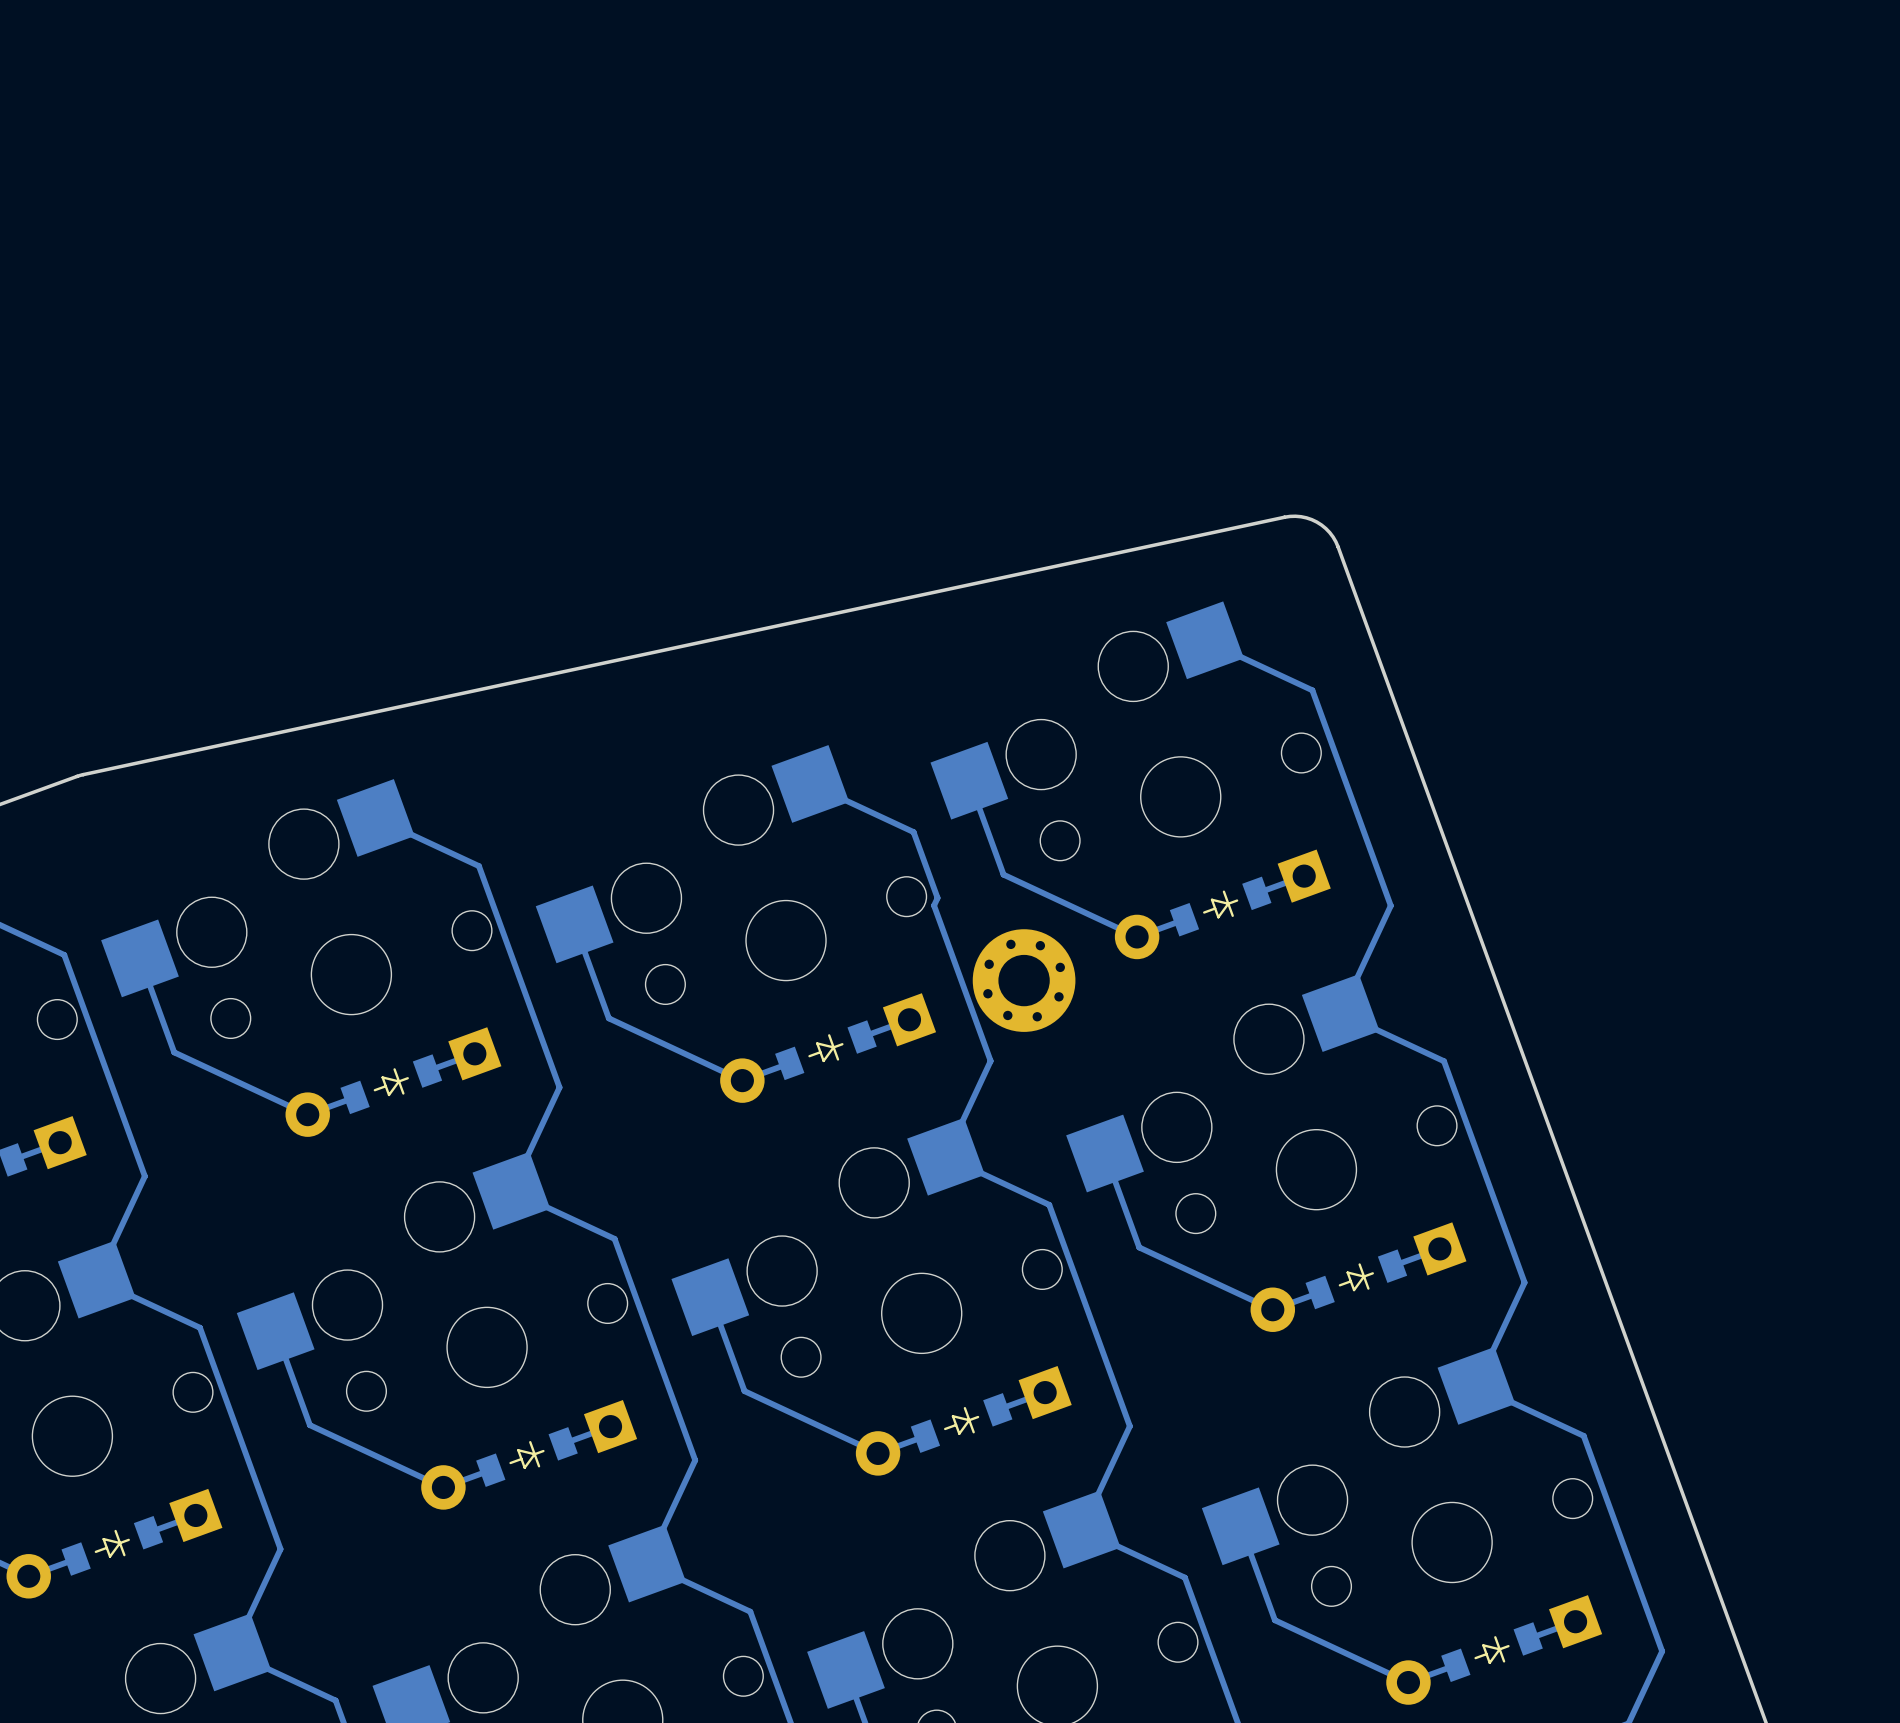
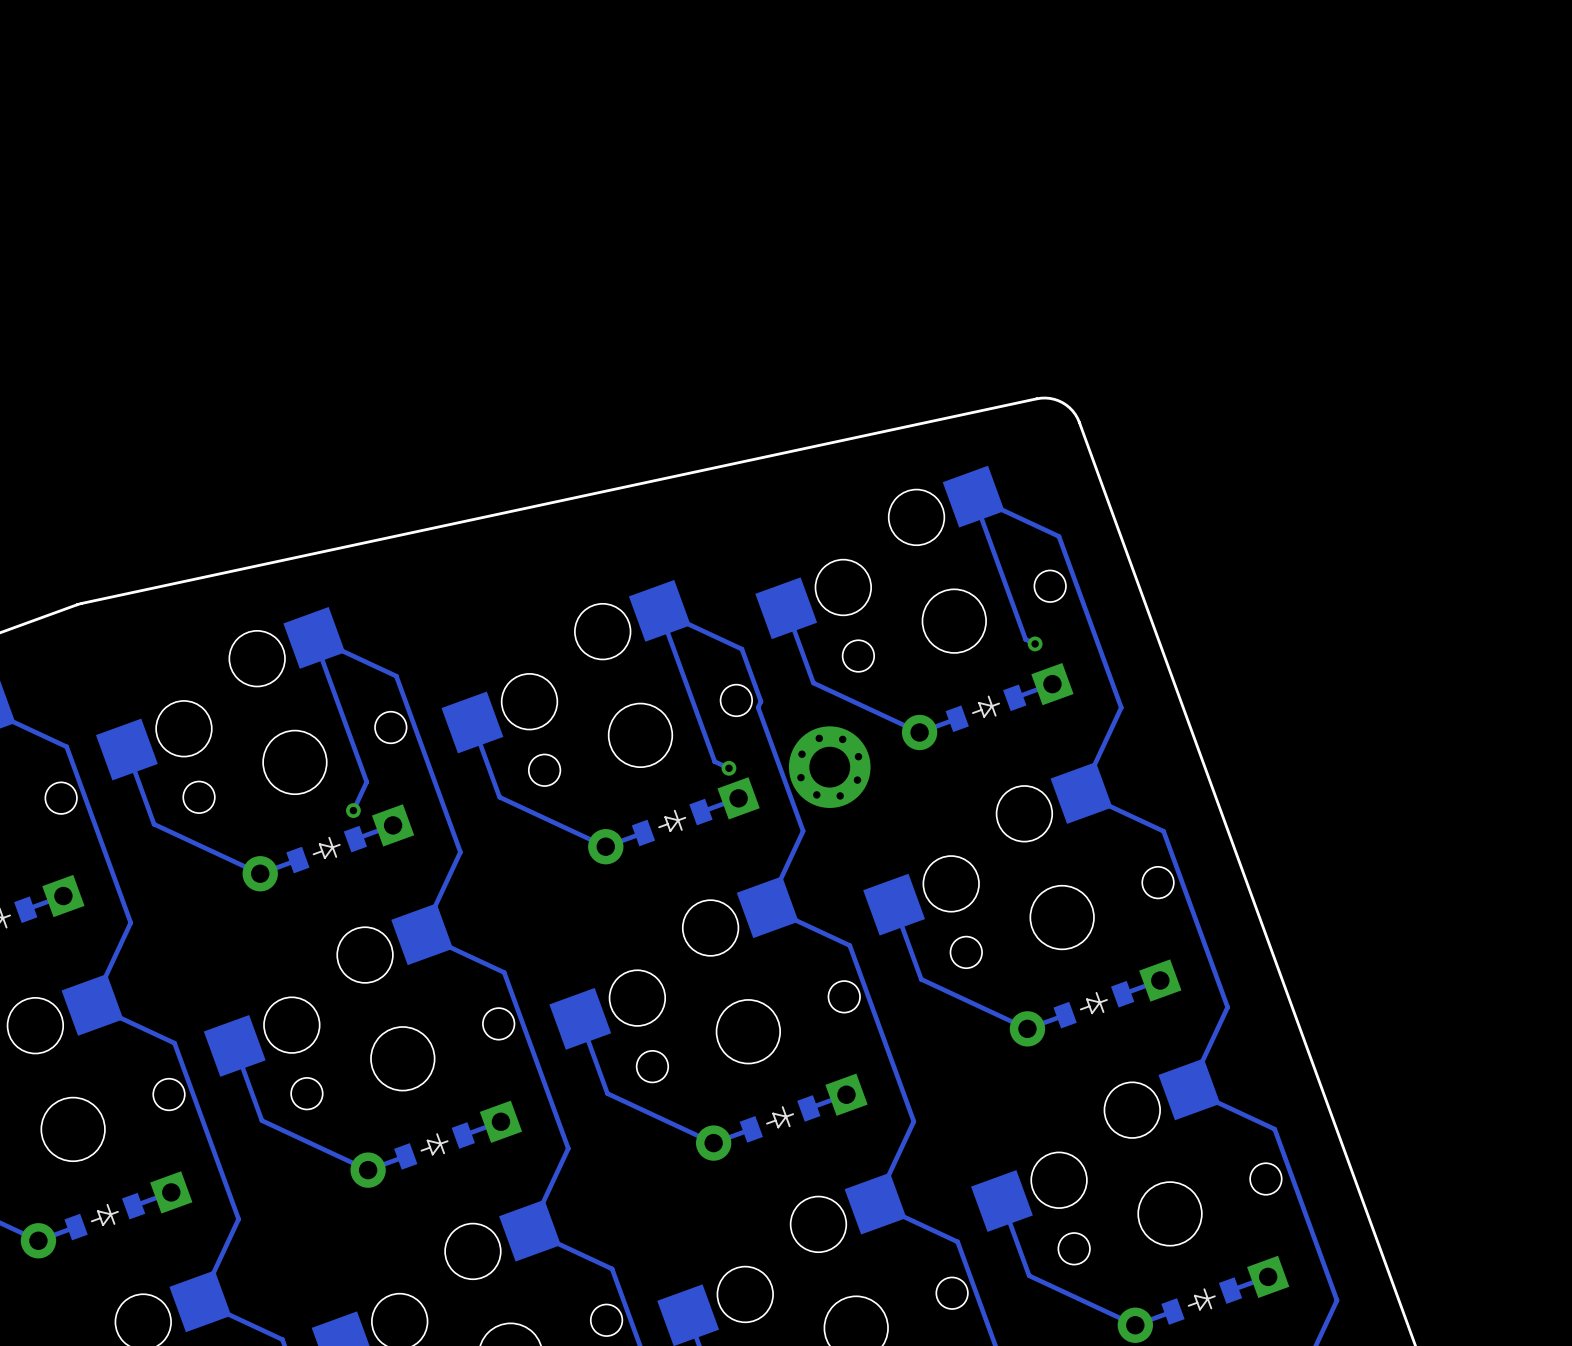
track: none -> (973, 496) (1025, 639) (1035, 643)
track: none -> (659, 610) (714, 761) (728, 768)
track: none -> (314, 637) (366, 782) (353, 810)
via: none -> (1035, 643)
via: none -> (728, 768)
via: none -> (353, 810)

